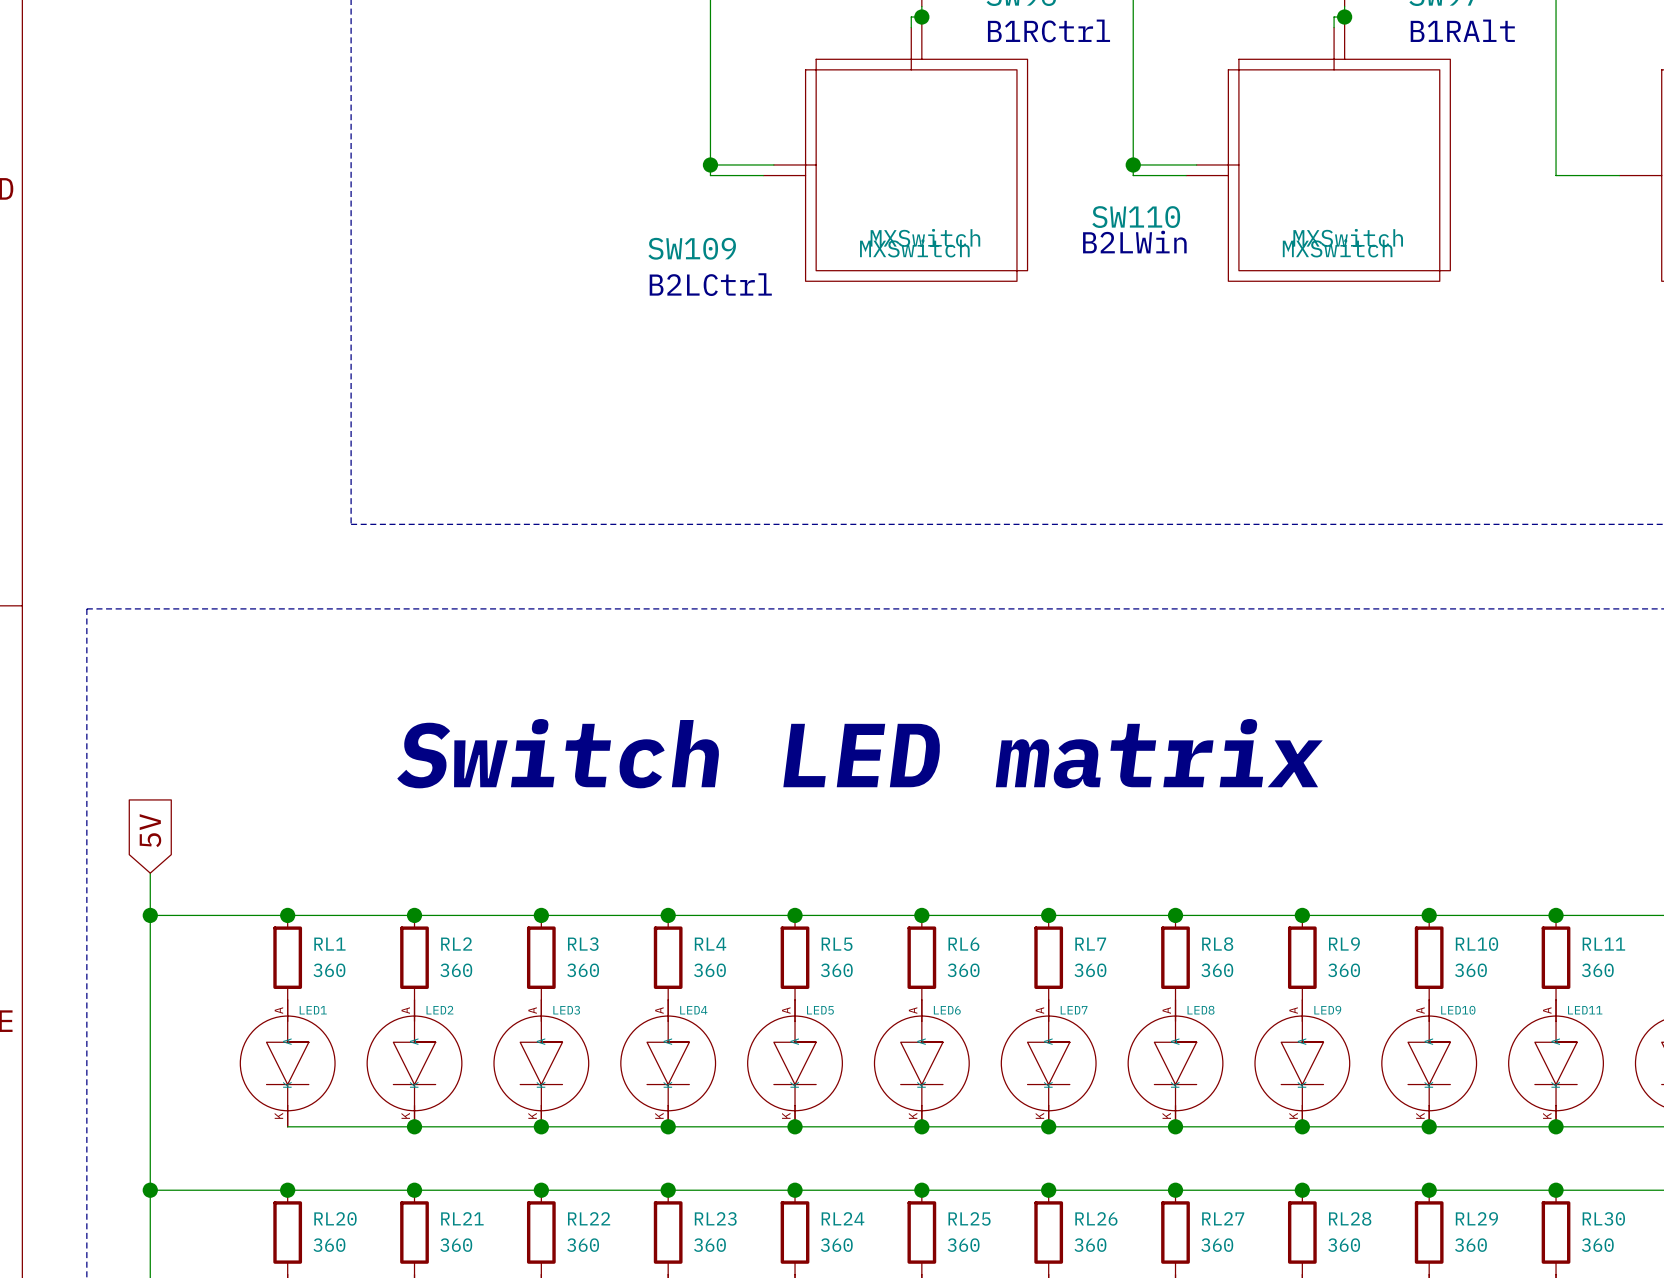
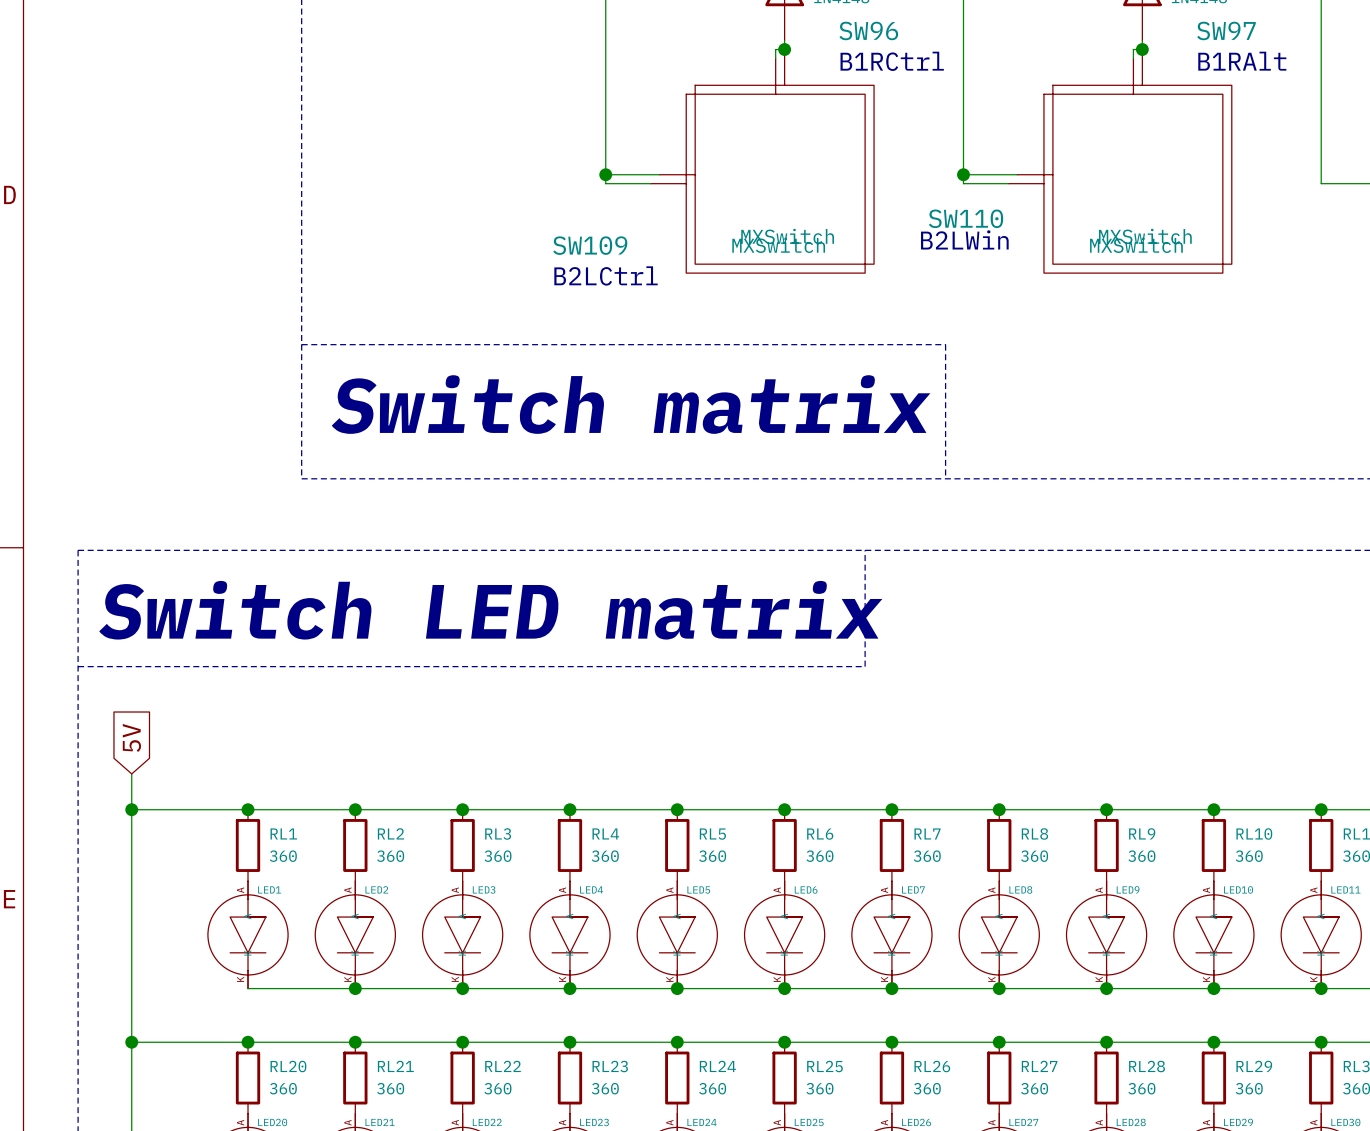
line: none -> (301, 344) (945, 344) (945, 478)
text: none -> Switch matrix (631, 404)
line: none -> (865, 550) (865, 666) (78, 666)
text position: Switch LED matrix (860, 753) -> Switch LED matrix (490, 610)

